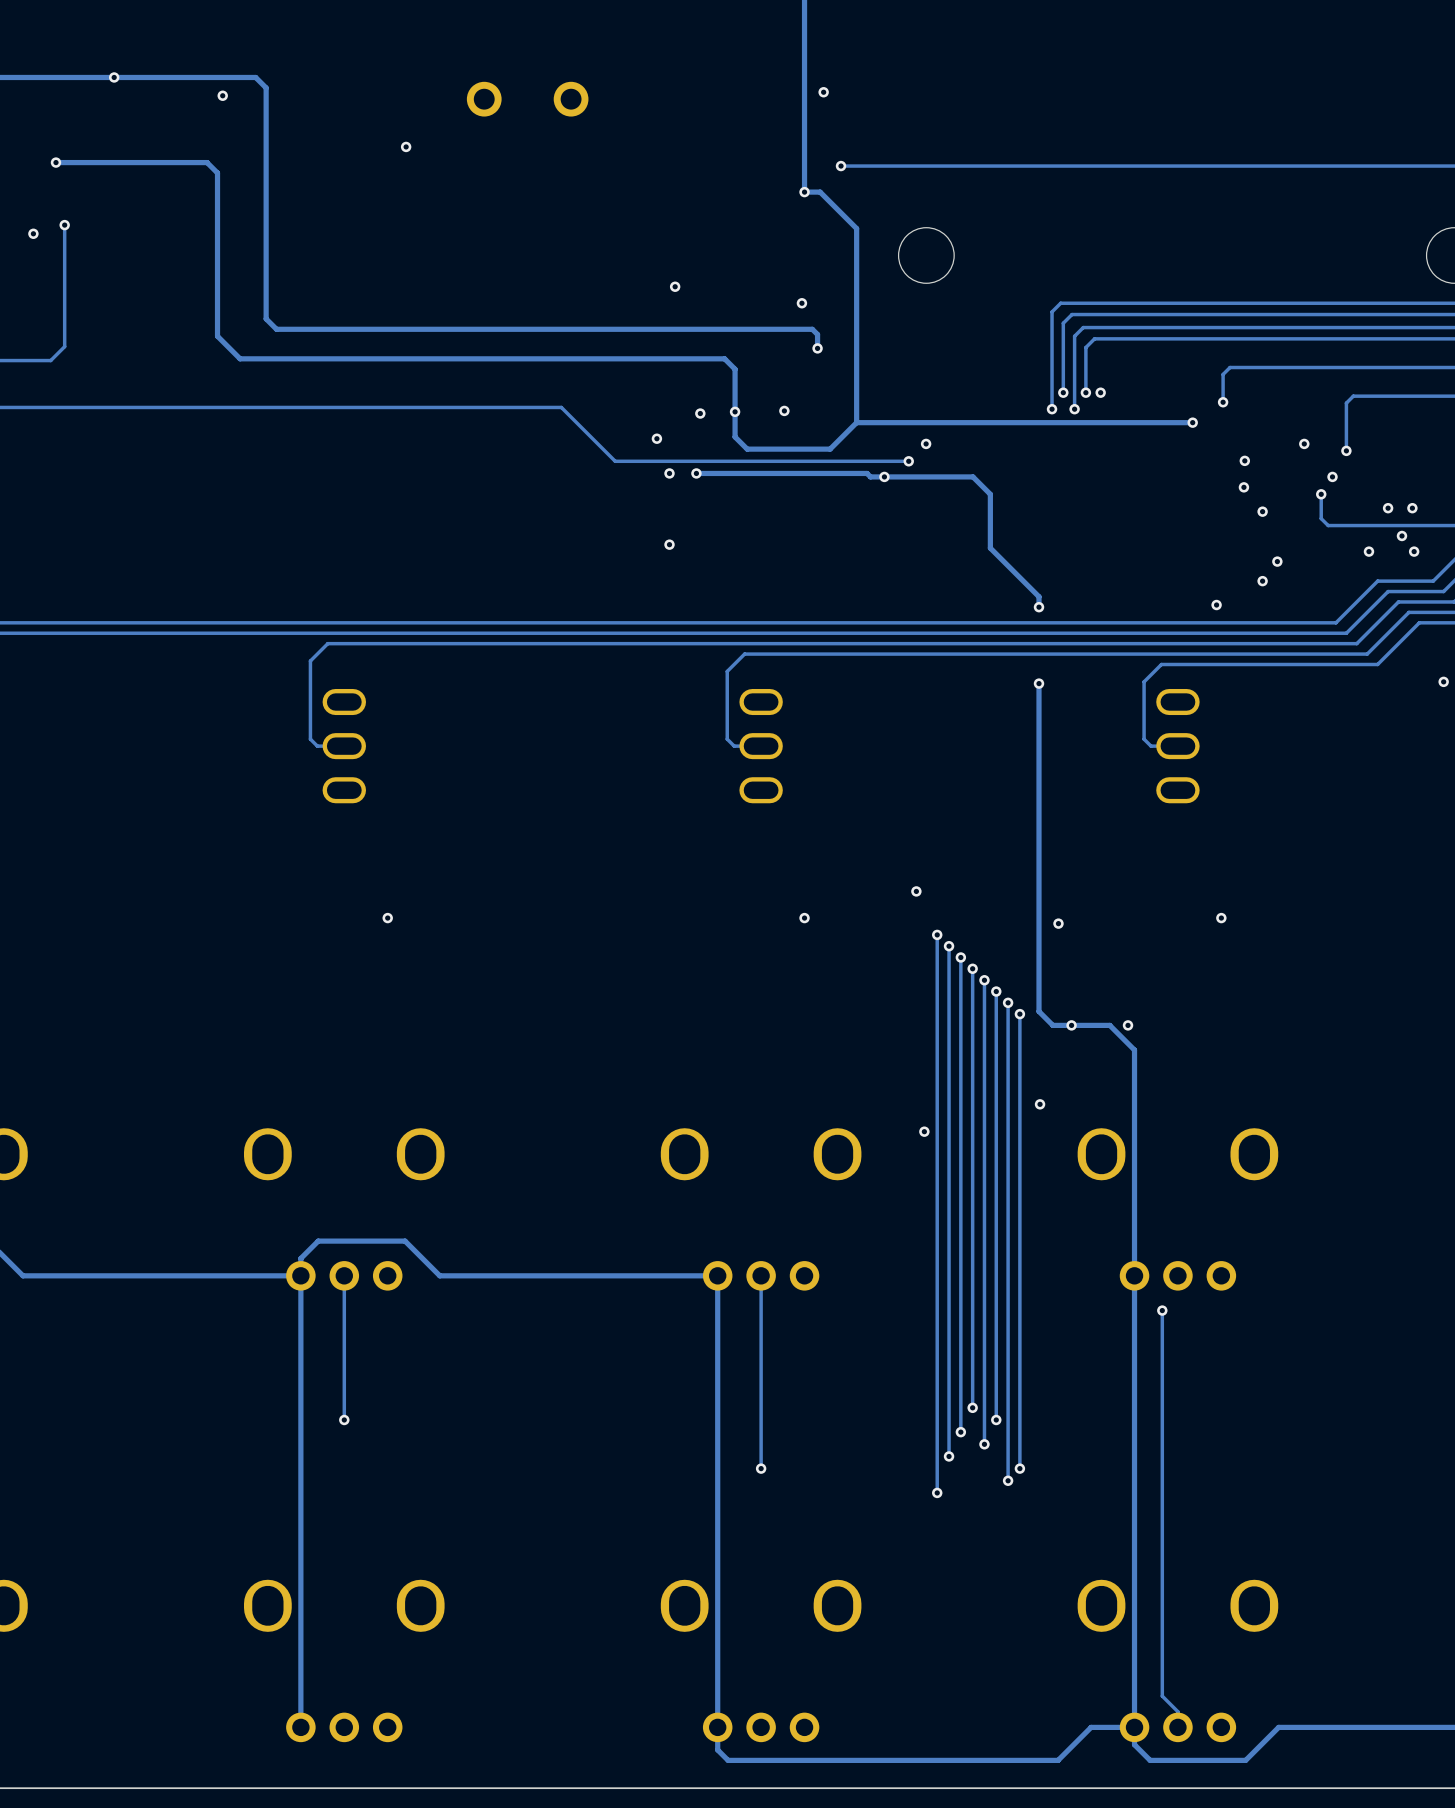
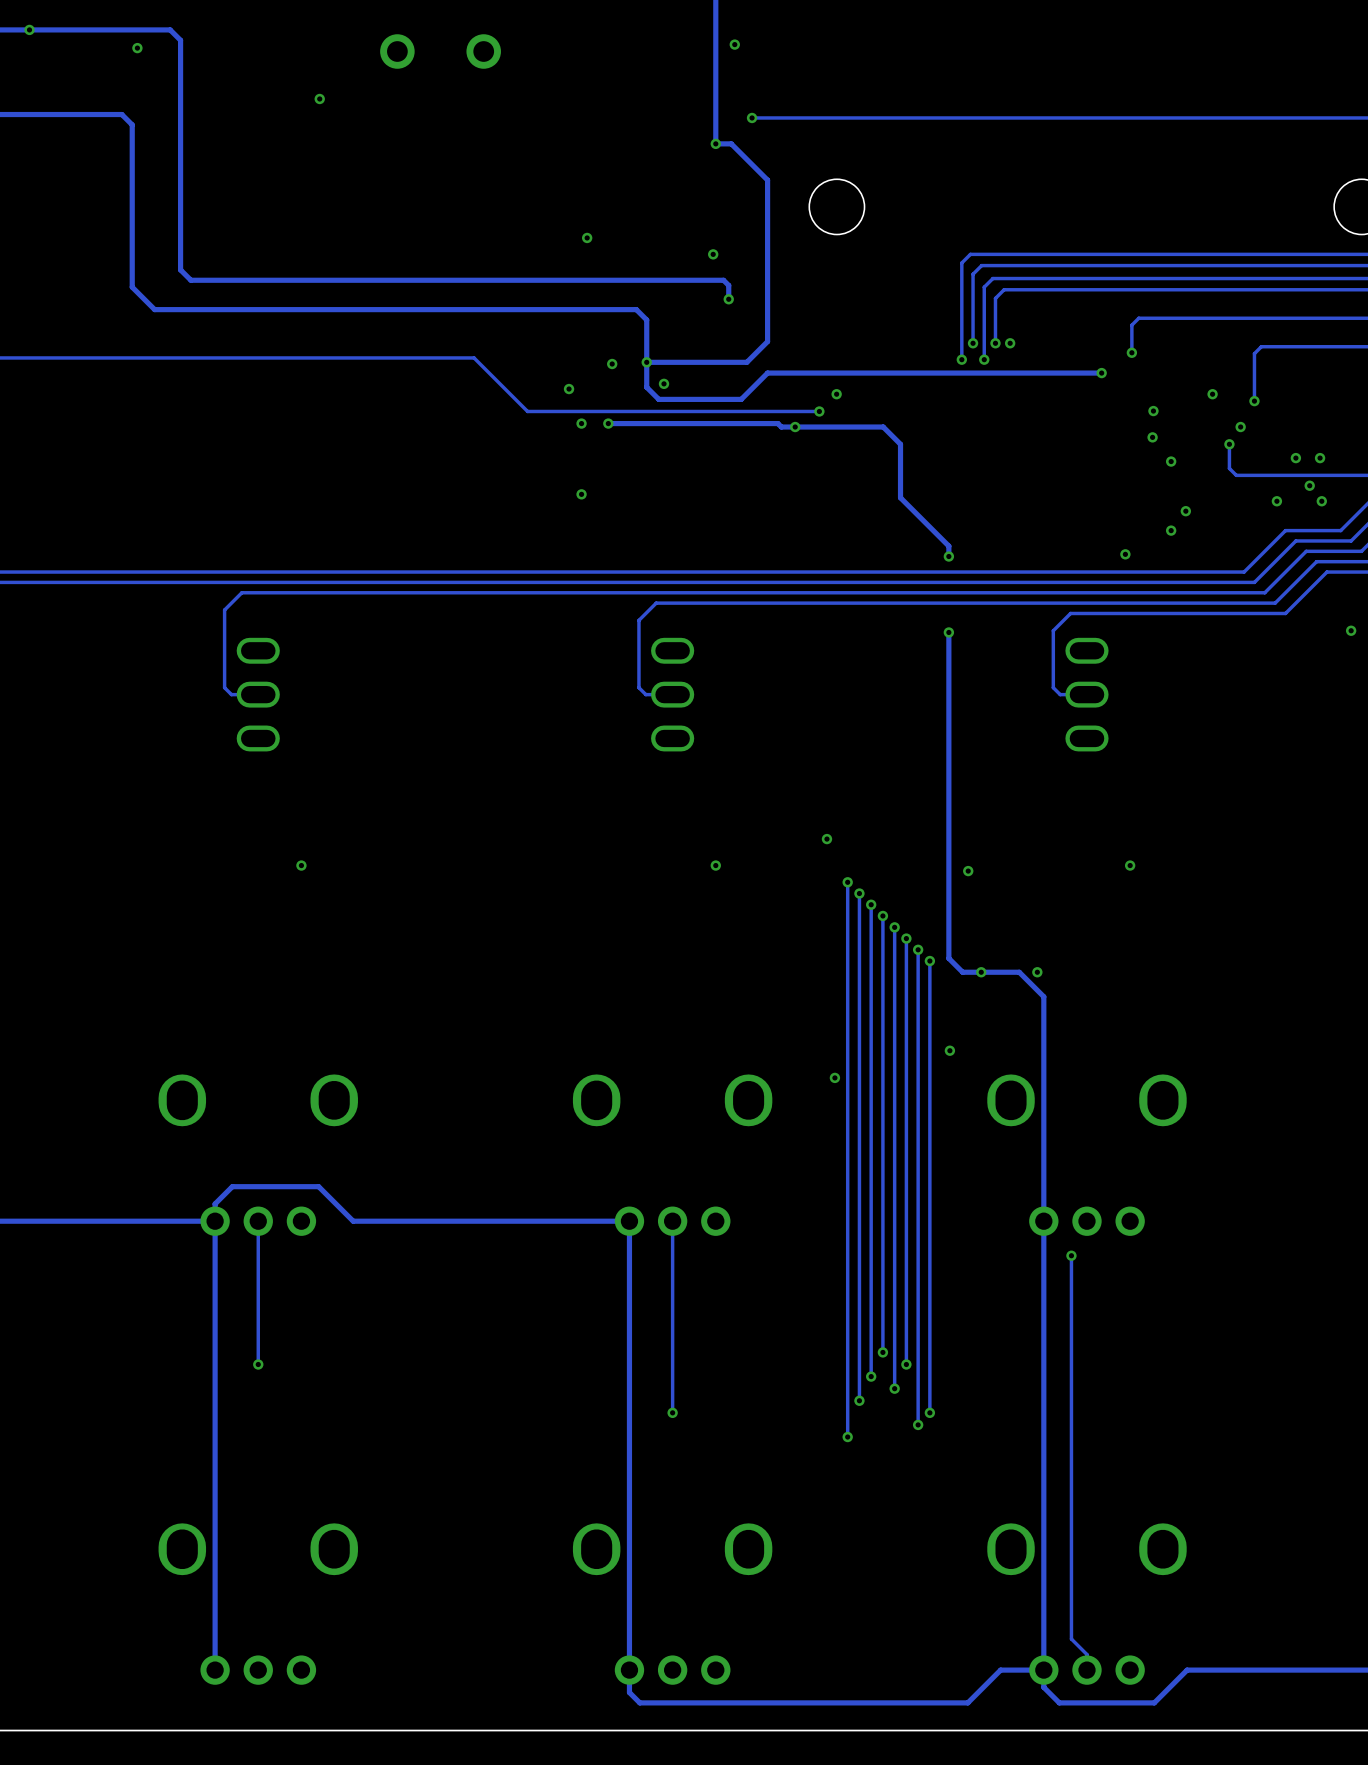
track: (856, 391) (856, 422) -> (767, 341) (746, 362) (646, 362)
via position: (784, 410) -> (663, 383)

